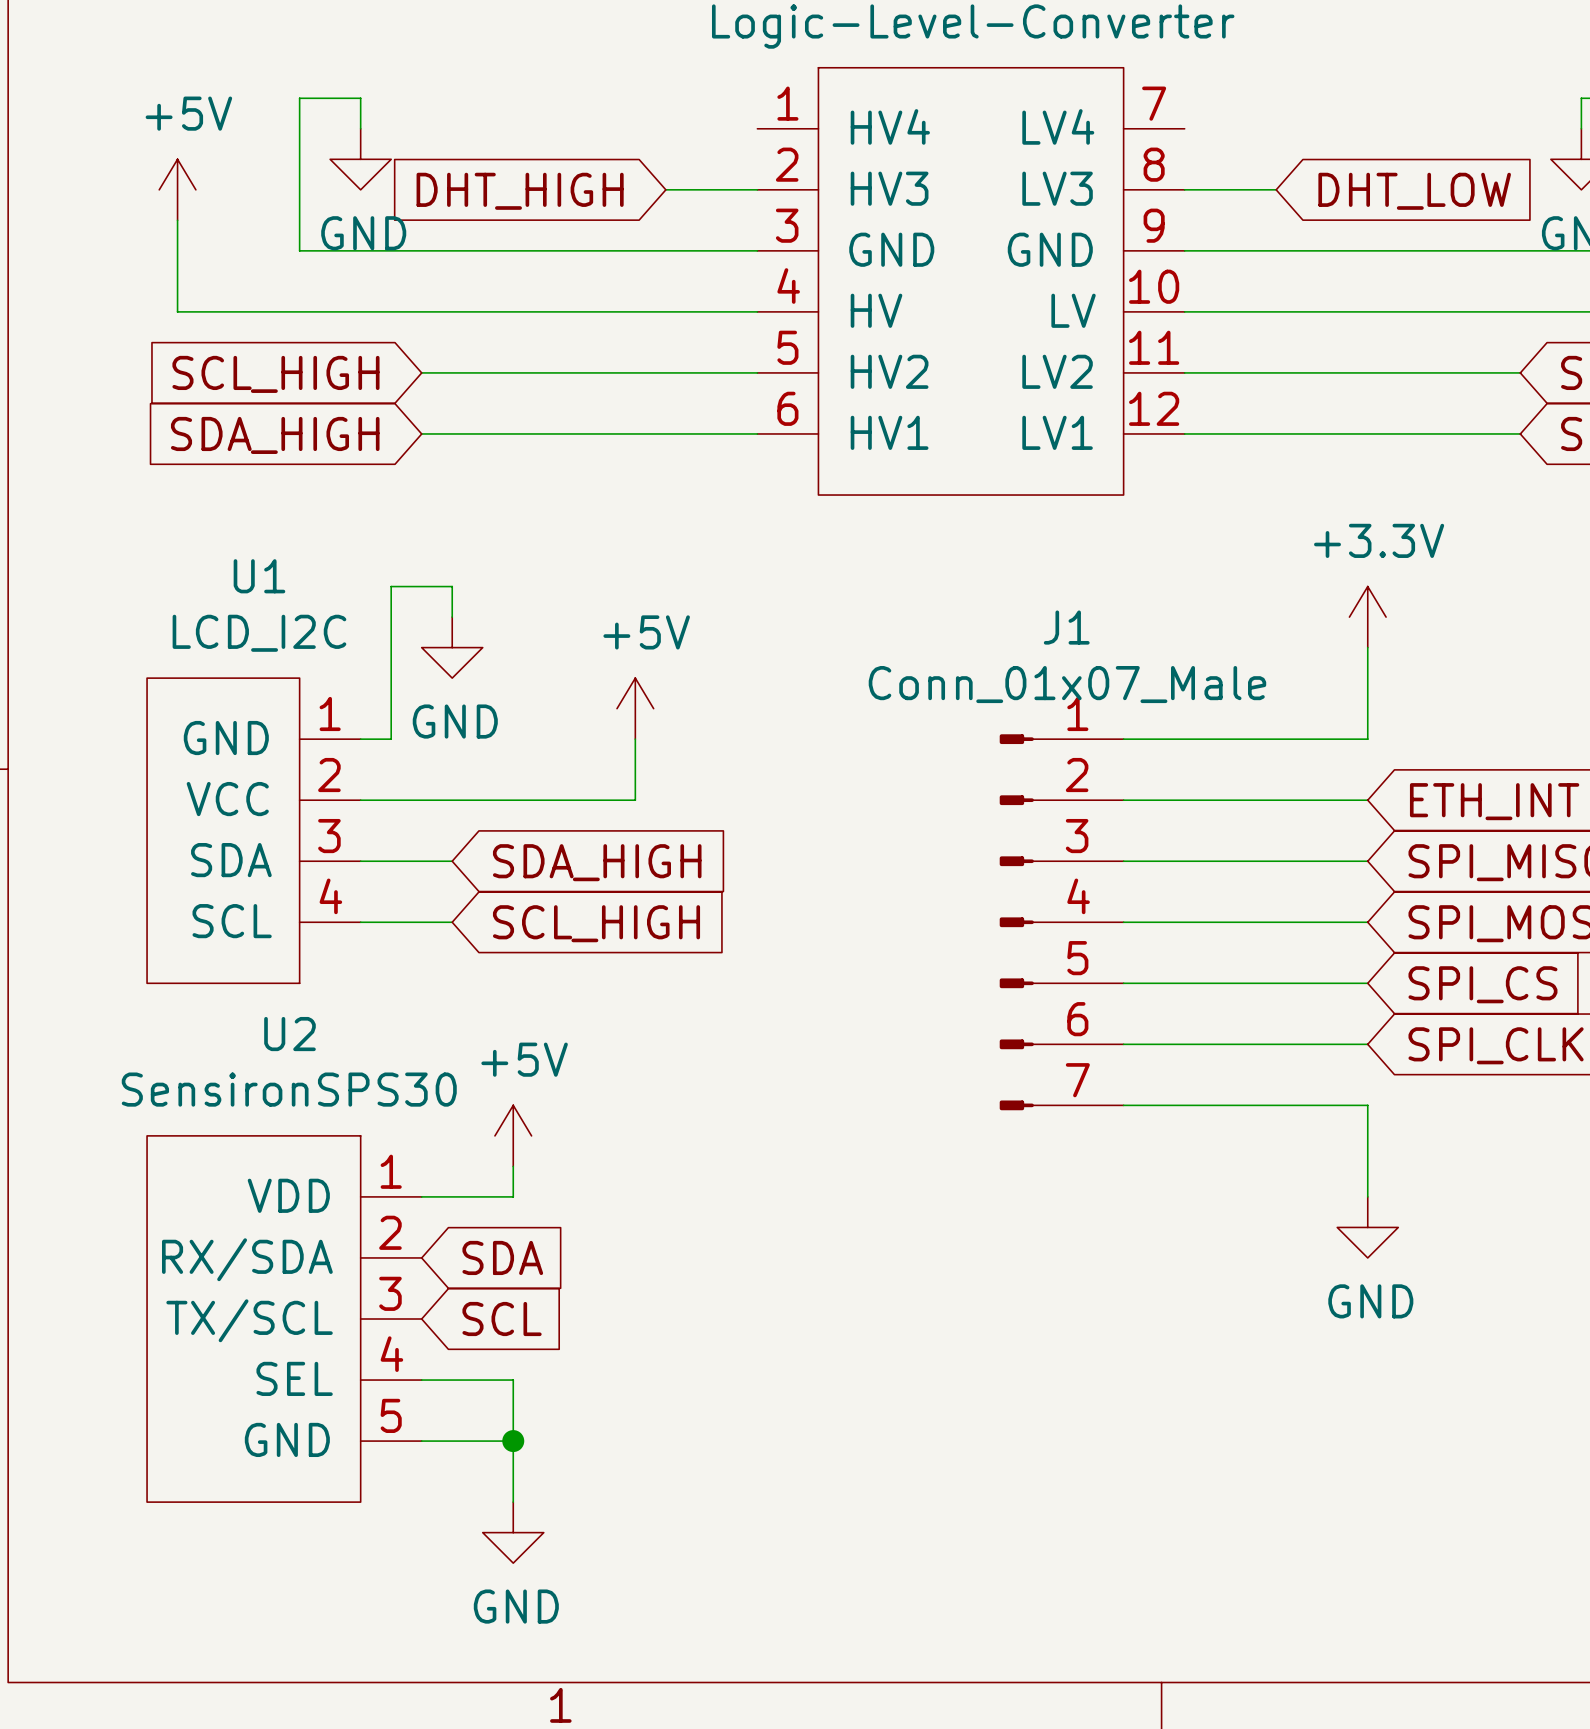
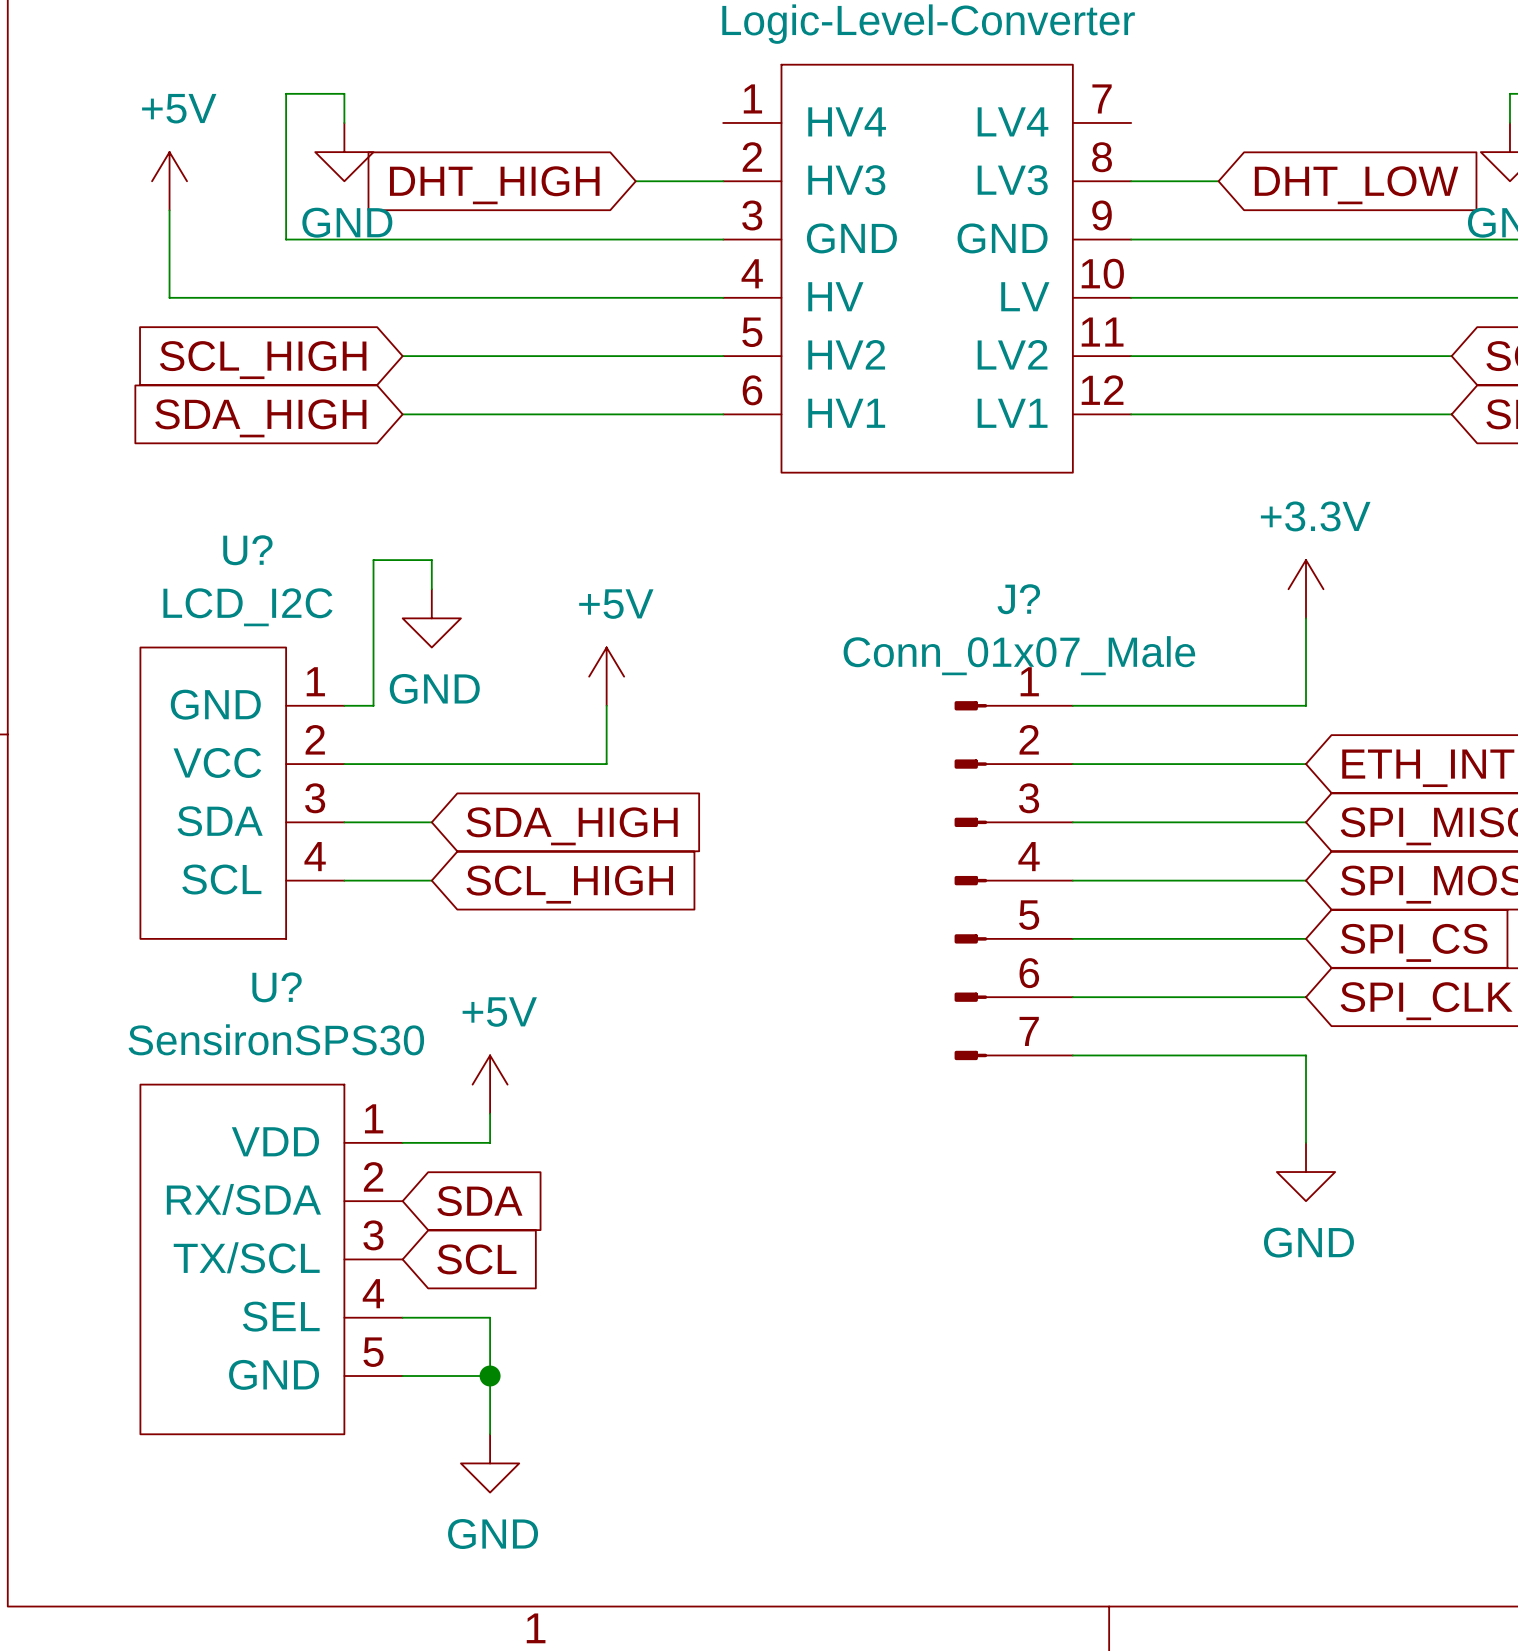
U1 name: U1 (259, 576) -> U? (247, 550)
J1 name: J1 (1066, 627) -> J? (1018, 599)
U2 name: U2 (289, 1034) -> U? (277, 987)

